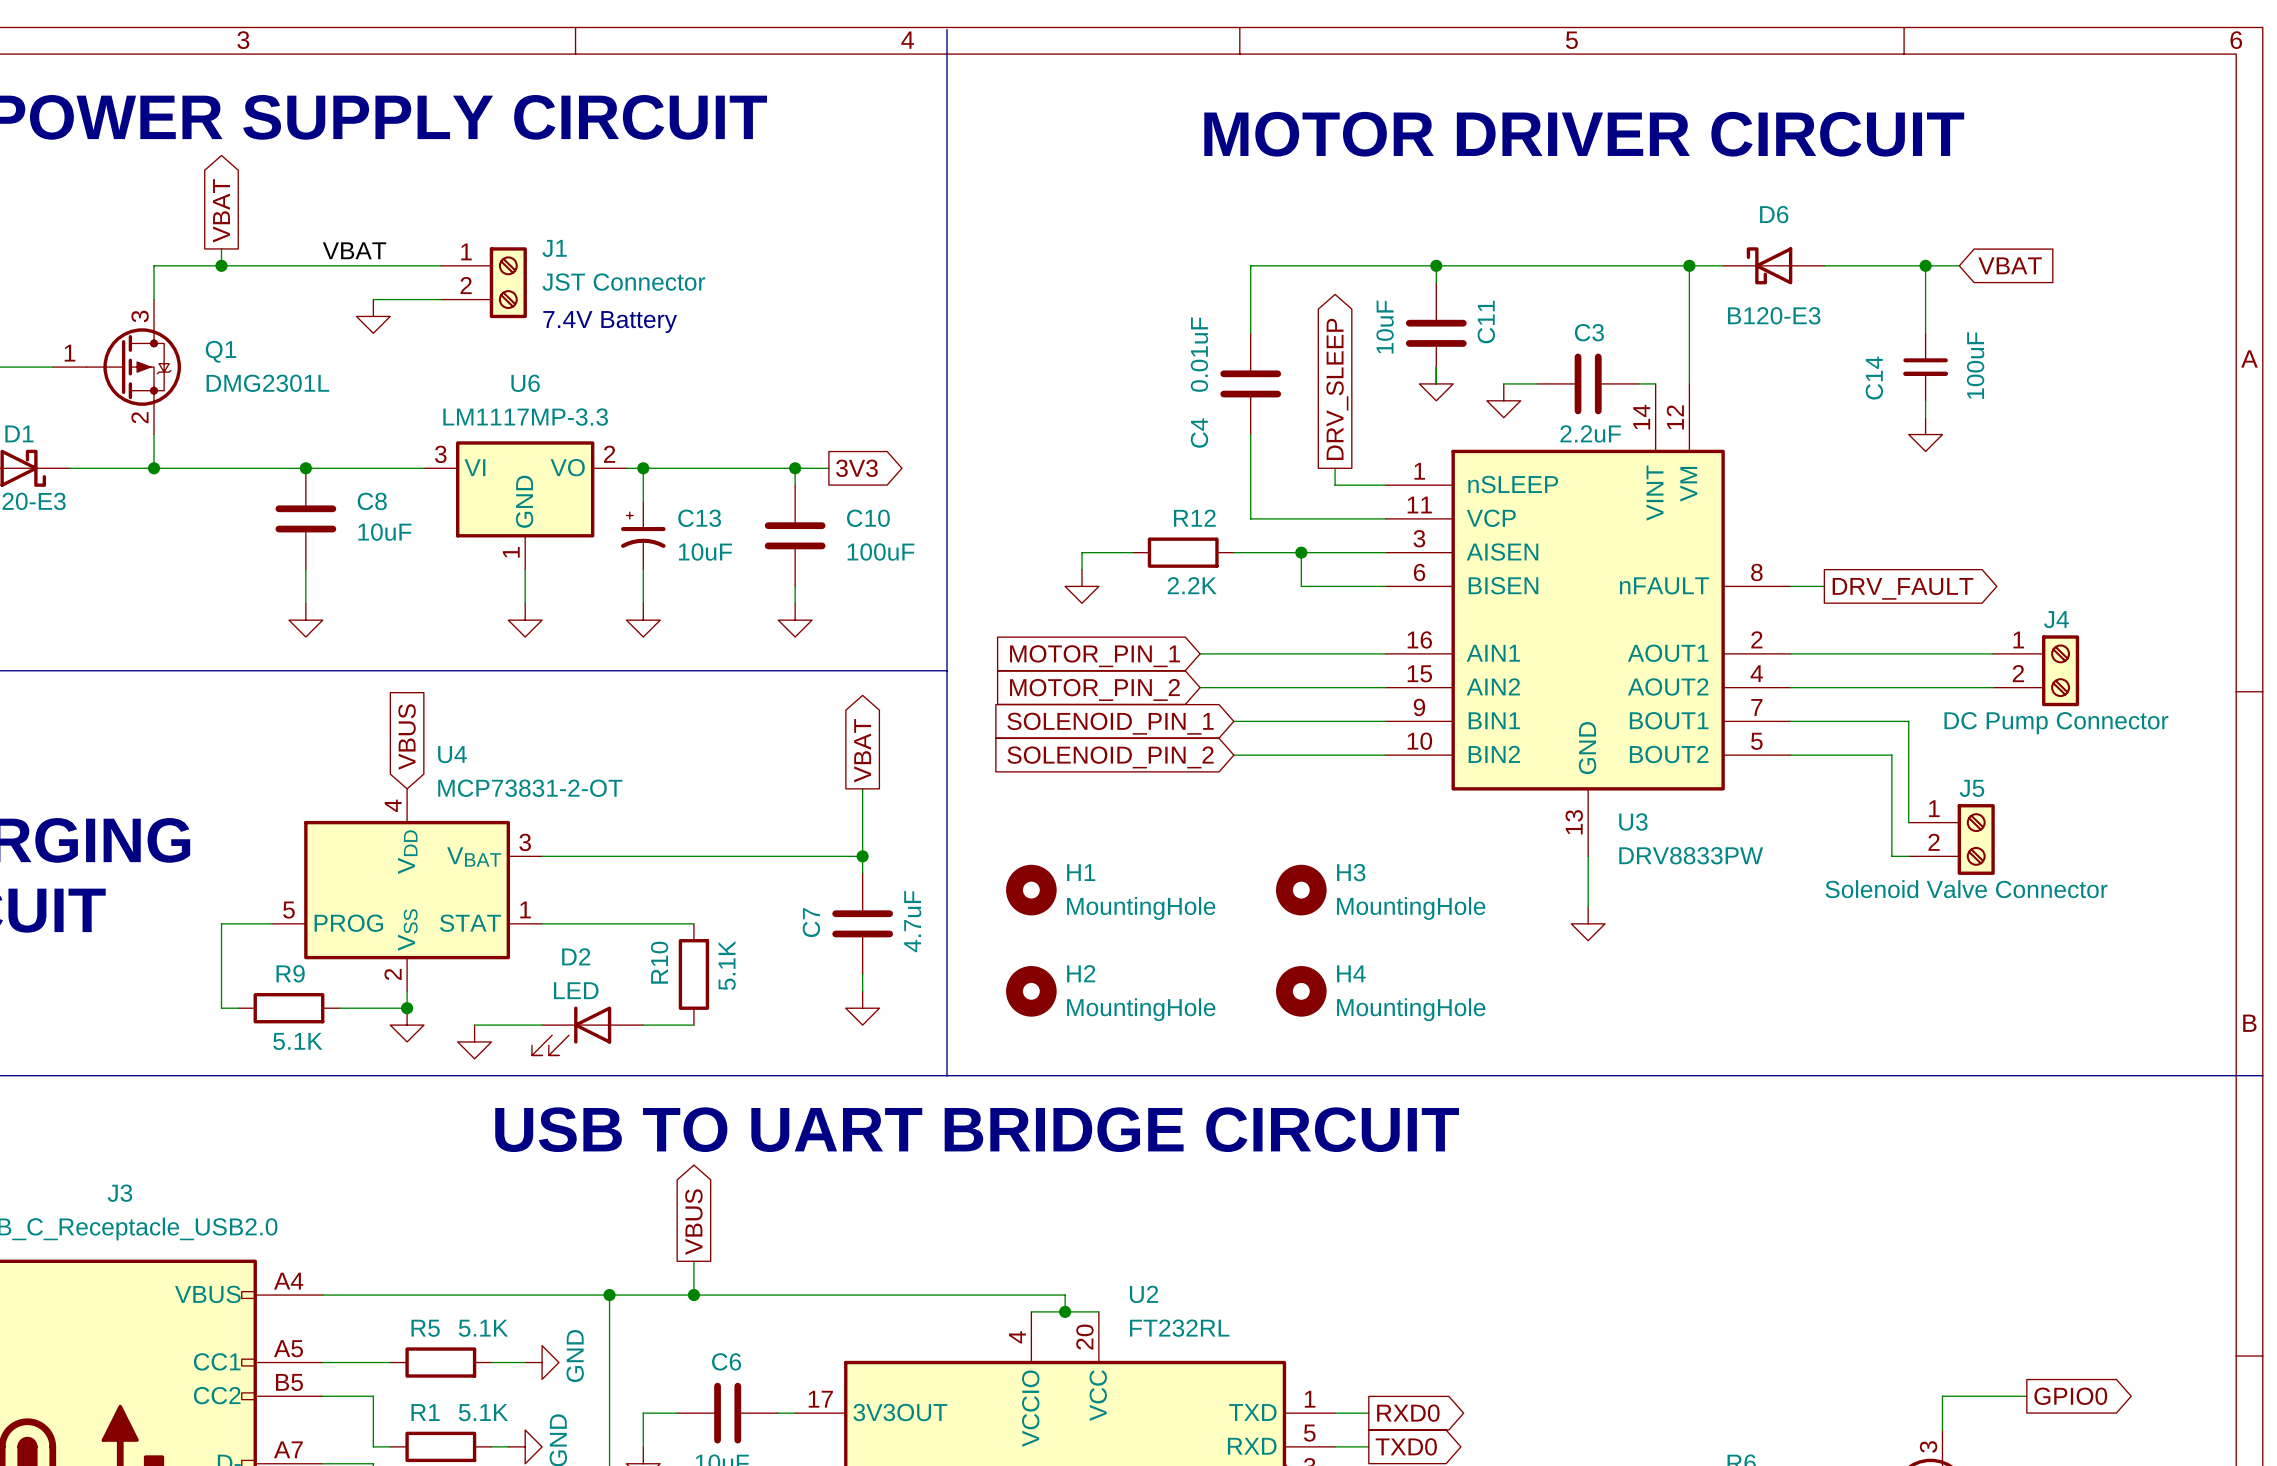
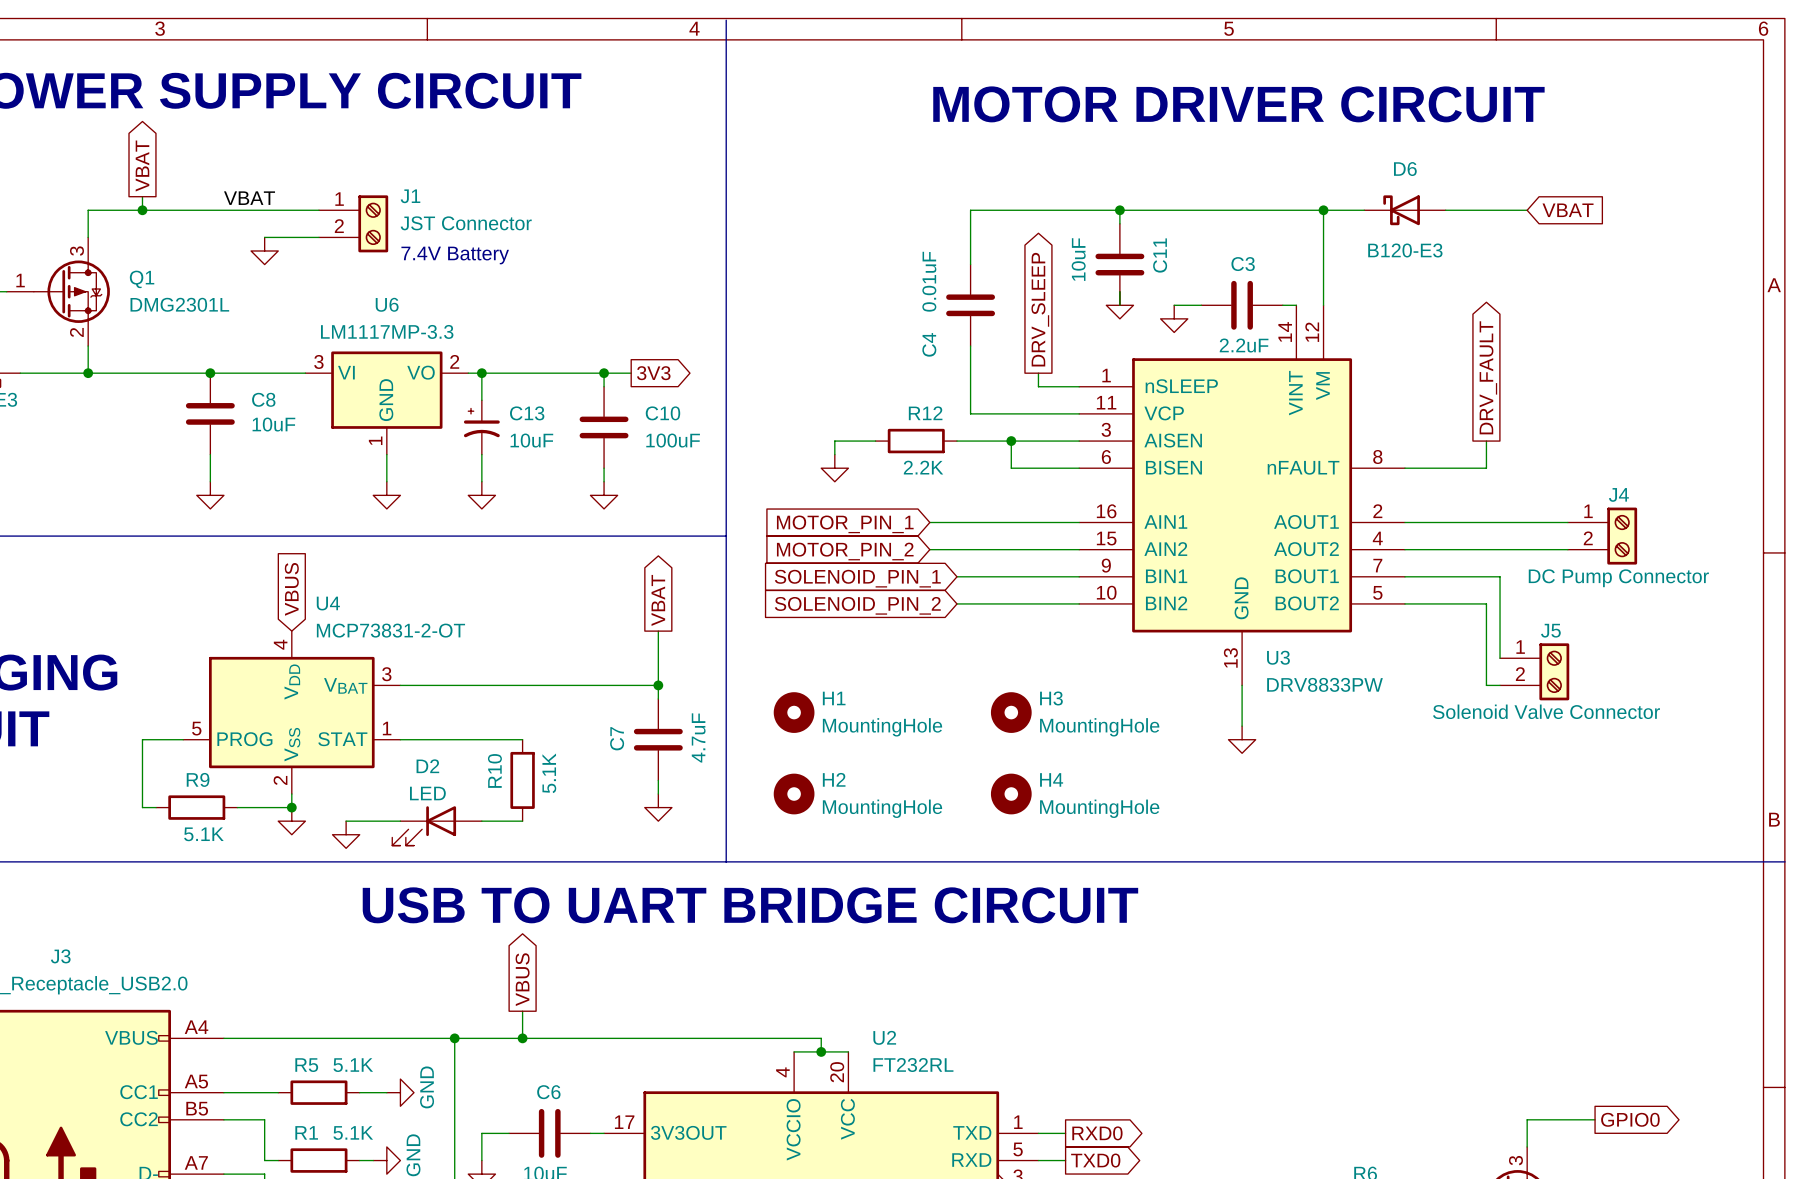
D6 position: (1773, 265) -> (1404, 210)
wire: (1925, 265) (1925, 333) -> none
junction: (1925, 265) -> none
wire: (1942, 265) (1959, 265) -> none
global label position: VBAT (2010, 265) -> VBAT (1568, 210)
C14: 100uF (1925, 367) -> none
wire: (1925, 400) (1925, 417) -> none
power symbol: (1925, 434) -> none
wire: none -> (1486, 441) (1486, 468) (1432, 468)
global label rotation: 0° (1902, 588) -> 90° counterclockwise (1488, 377)

